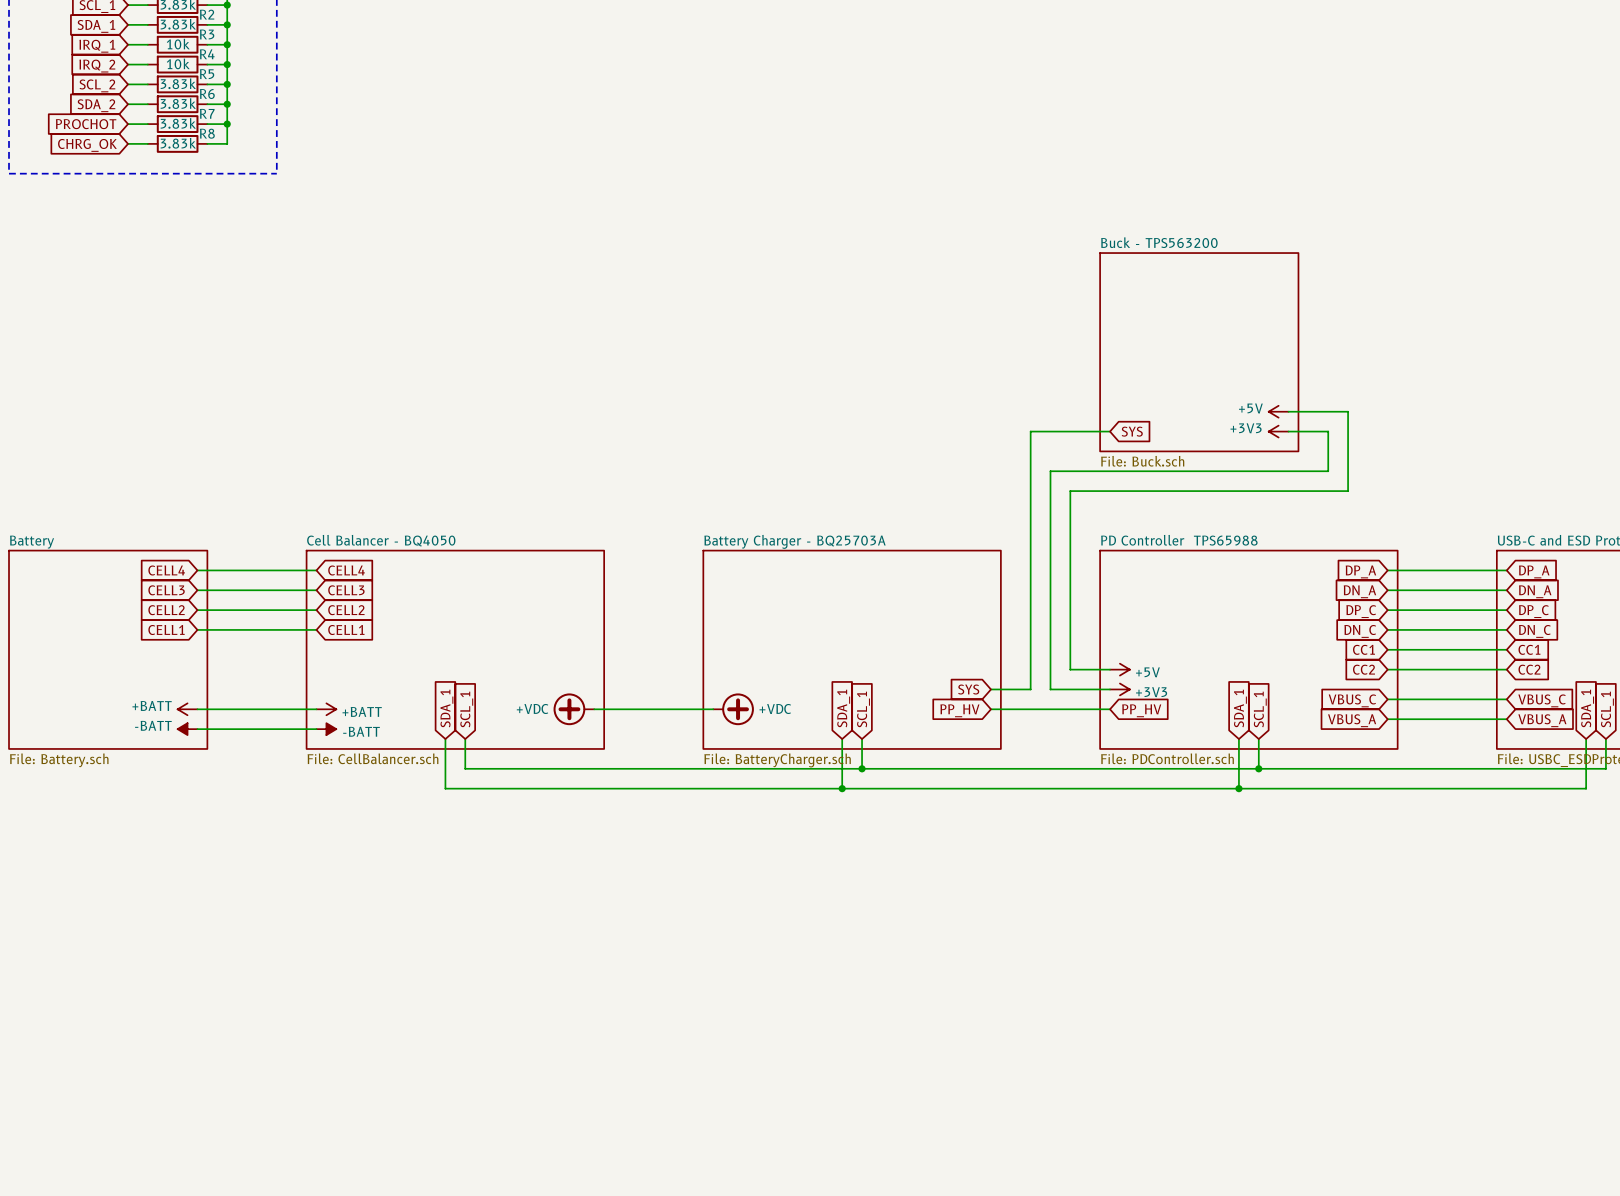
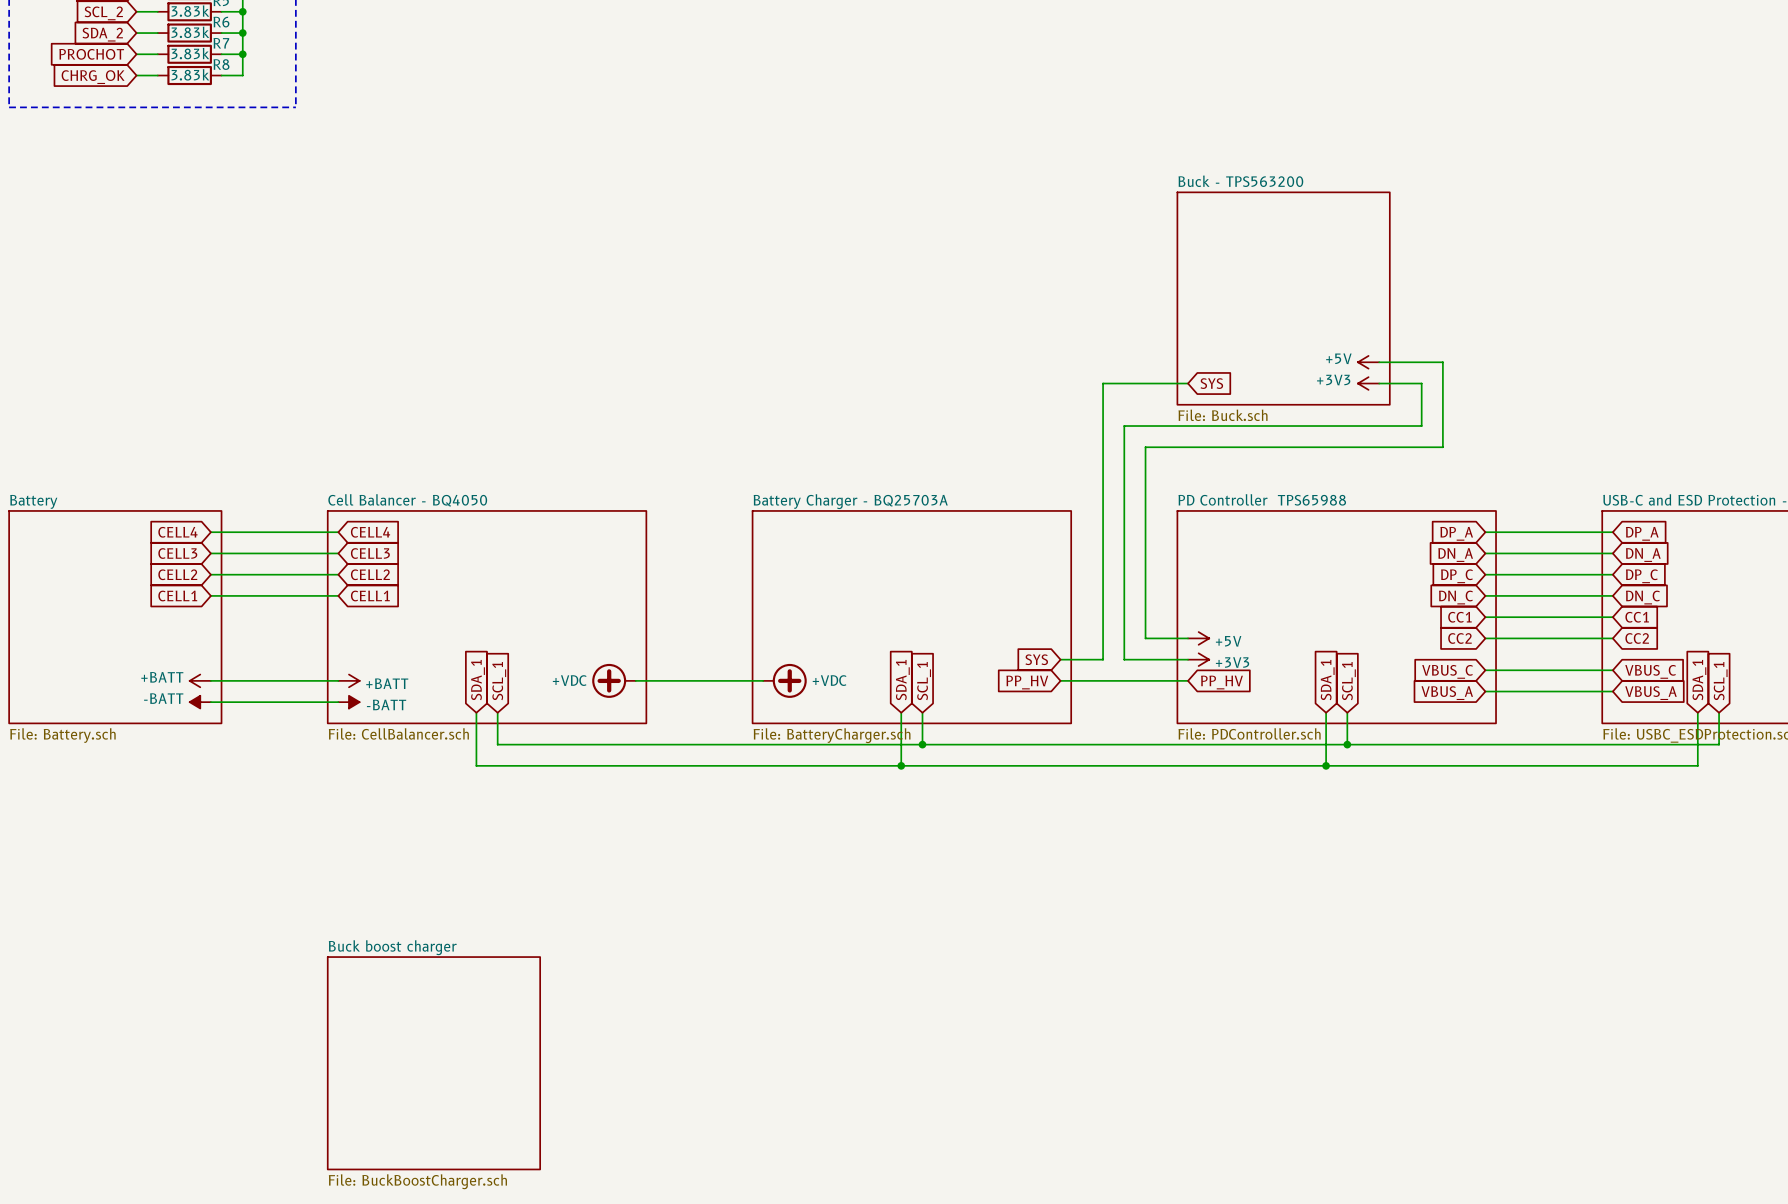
sheet Buck boost charger: none -> File: BuckBoostCharger.sch (433, 1063)

